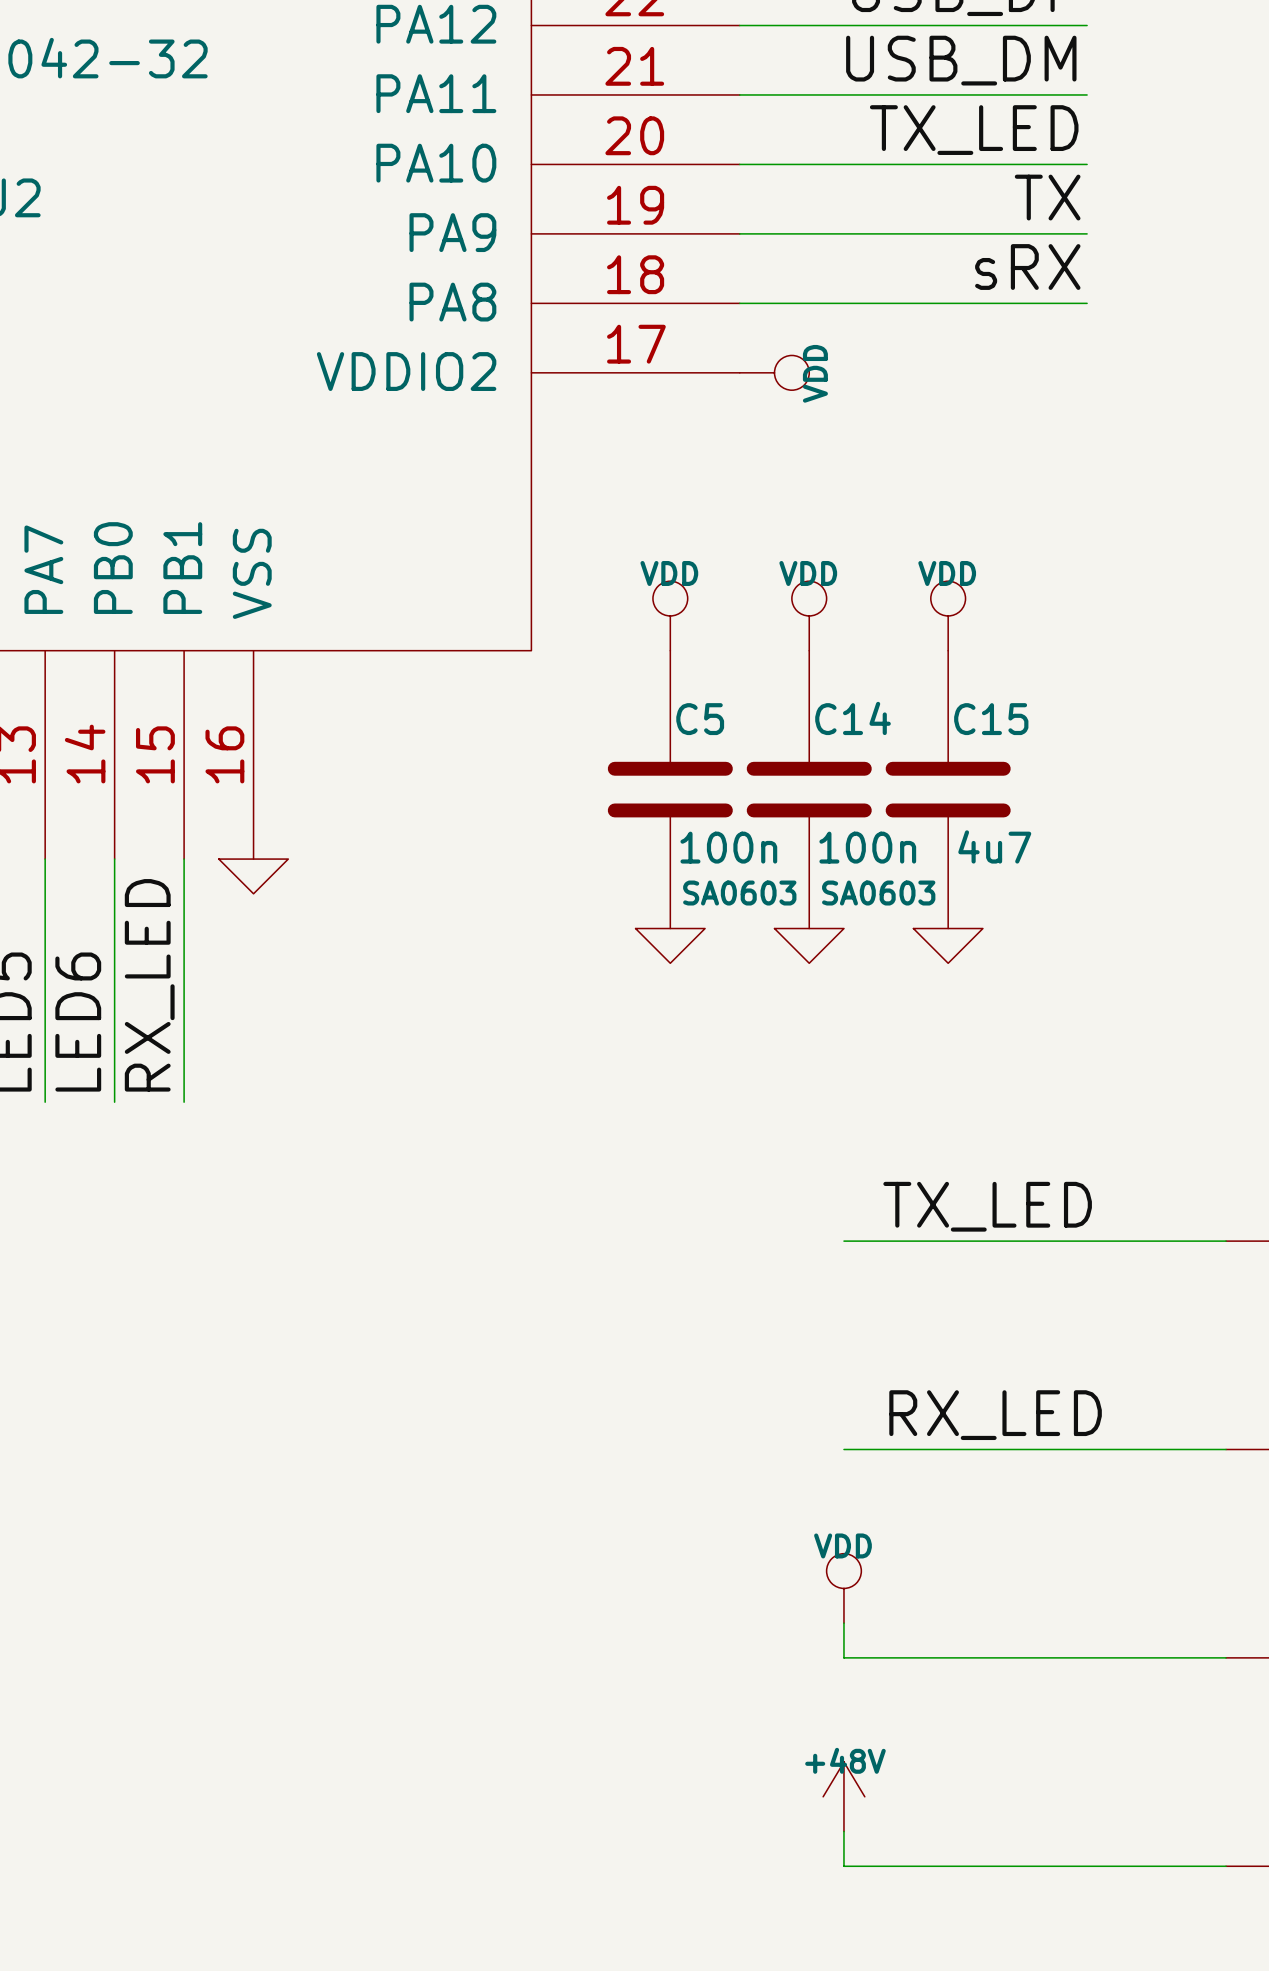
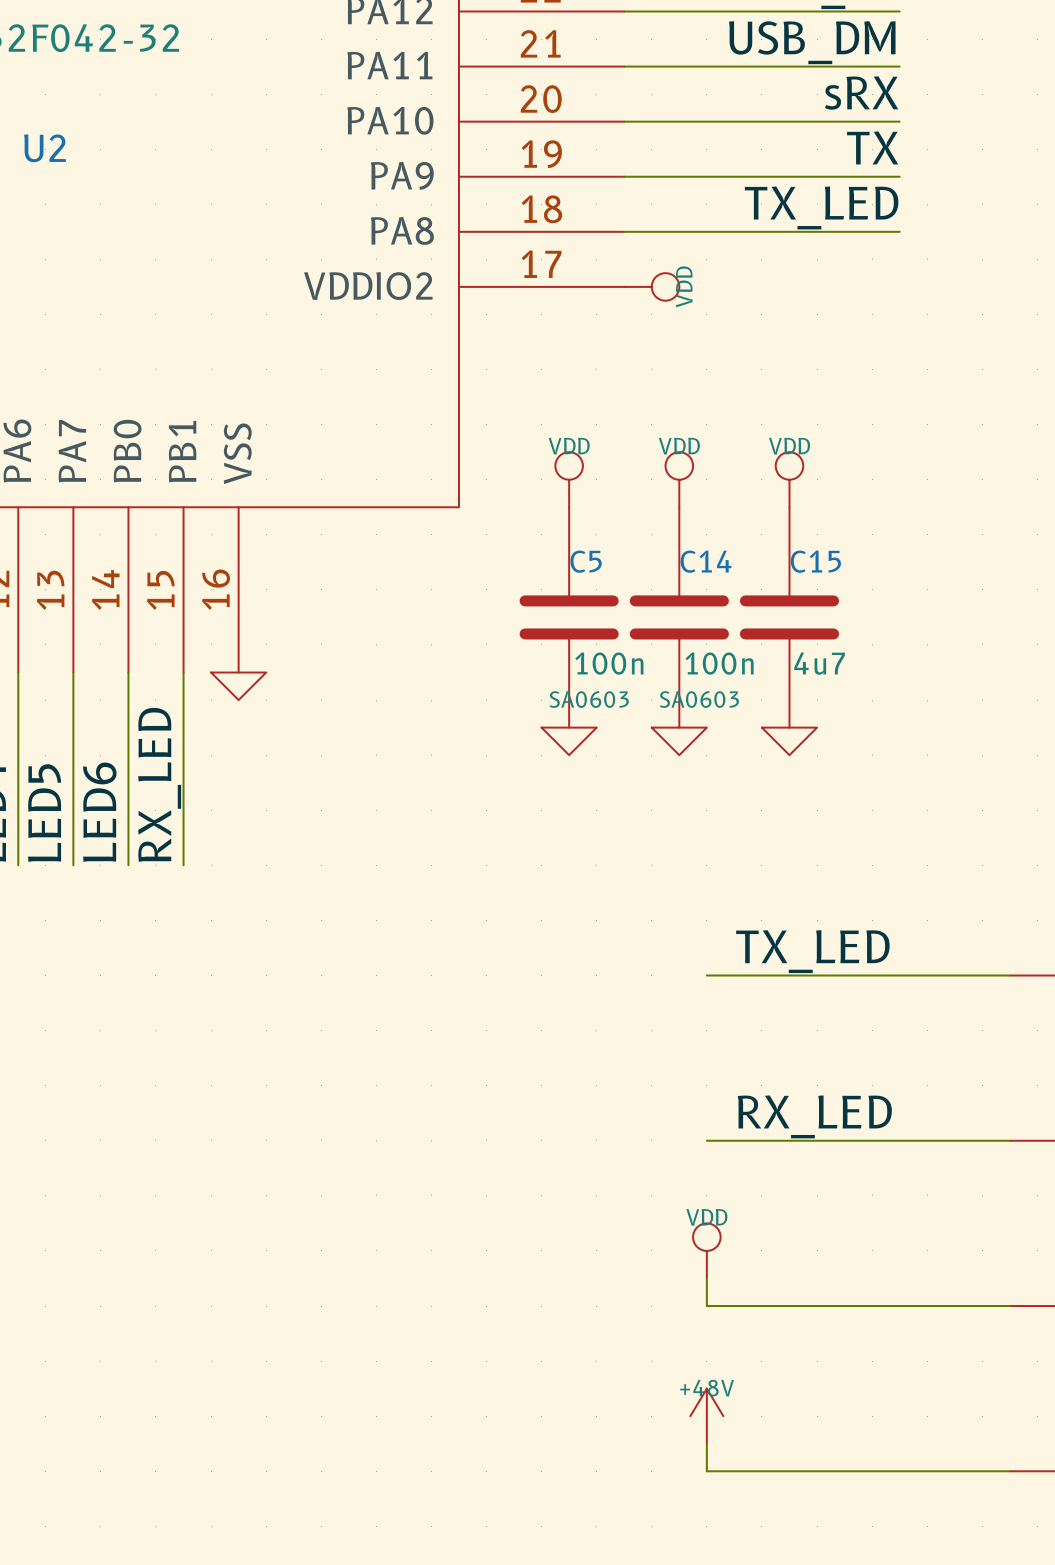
label: TX_LED (974, 130) -> sRX (861, 93)
label: sRX (1027, 267) -> TX_LED (821, 207)
C5 text position: SA0603 (739, 893) -> SA0603 (589, 699)
C14 text position: SA0603 (878, 893) -> SA0603 (699, 699)

